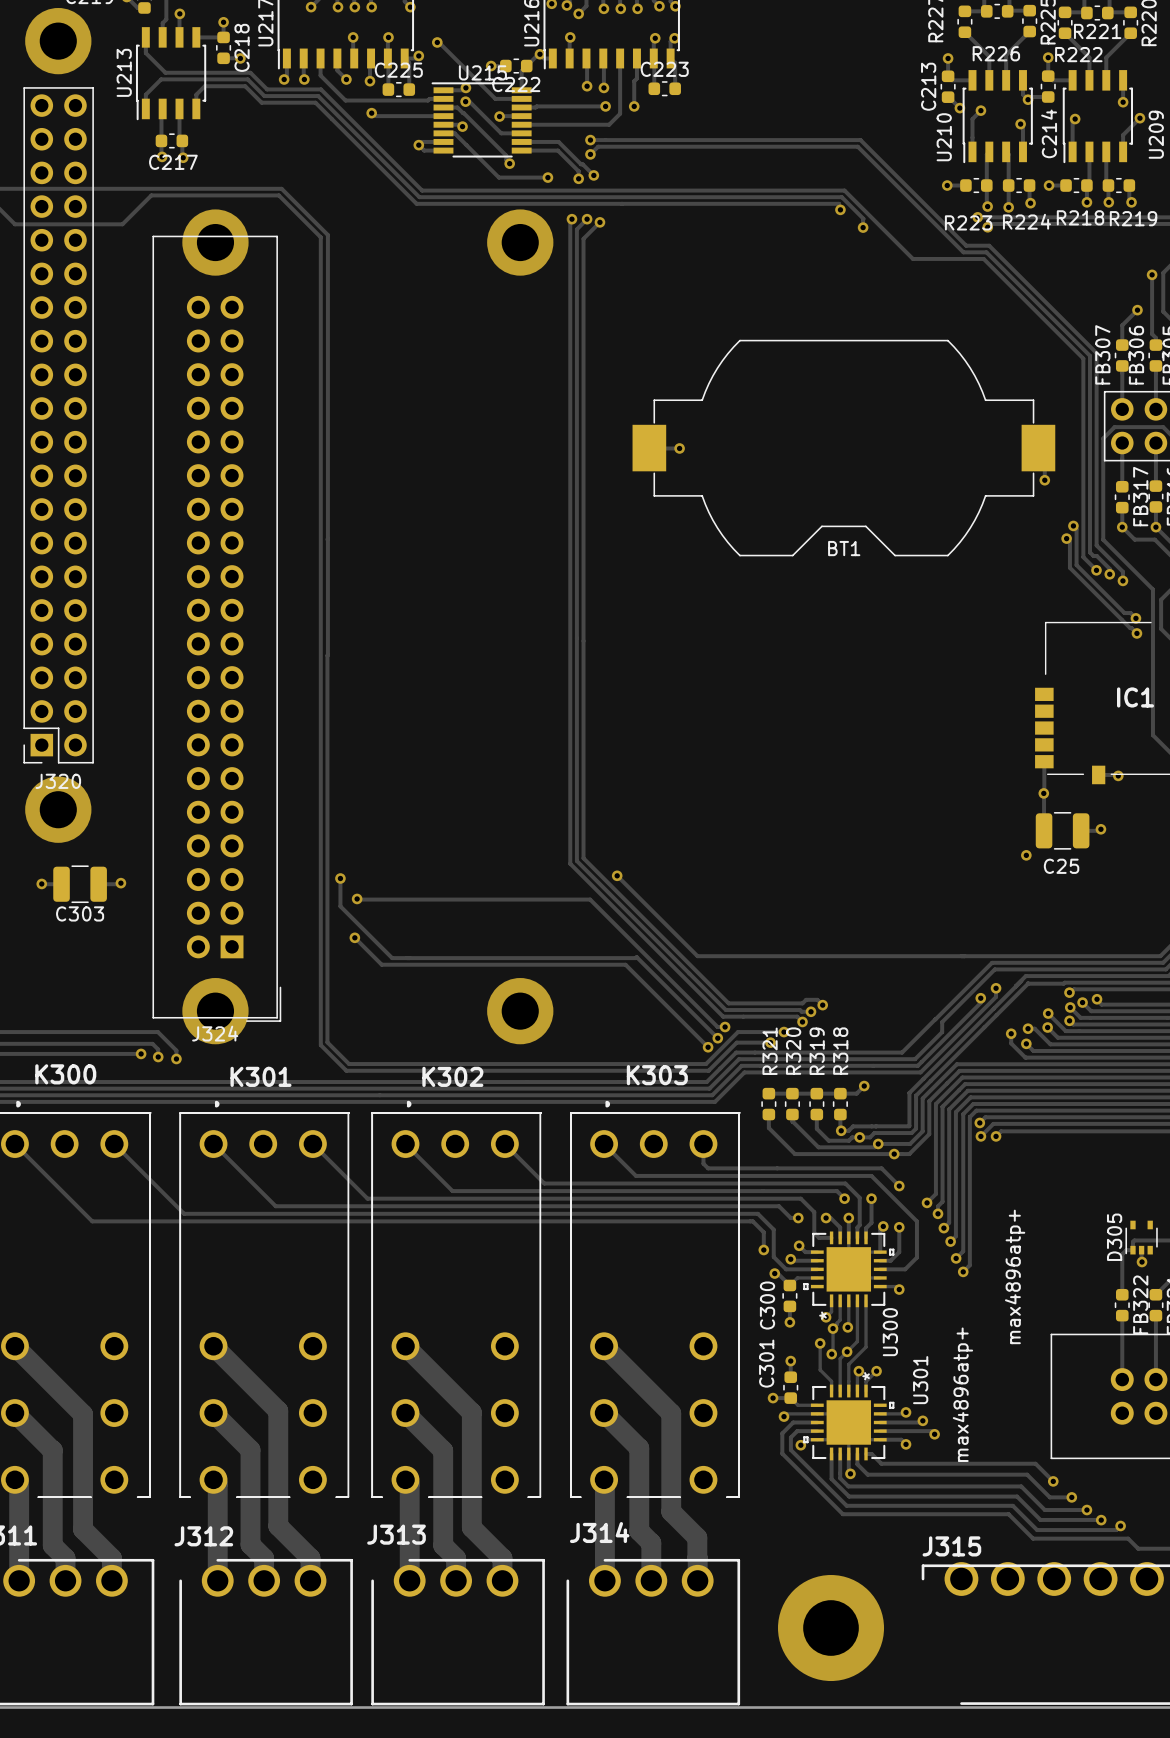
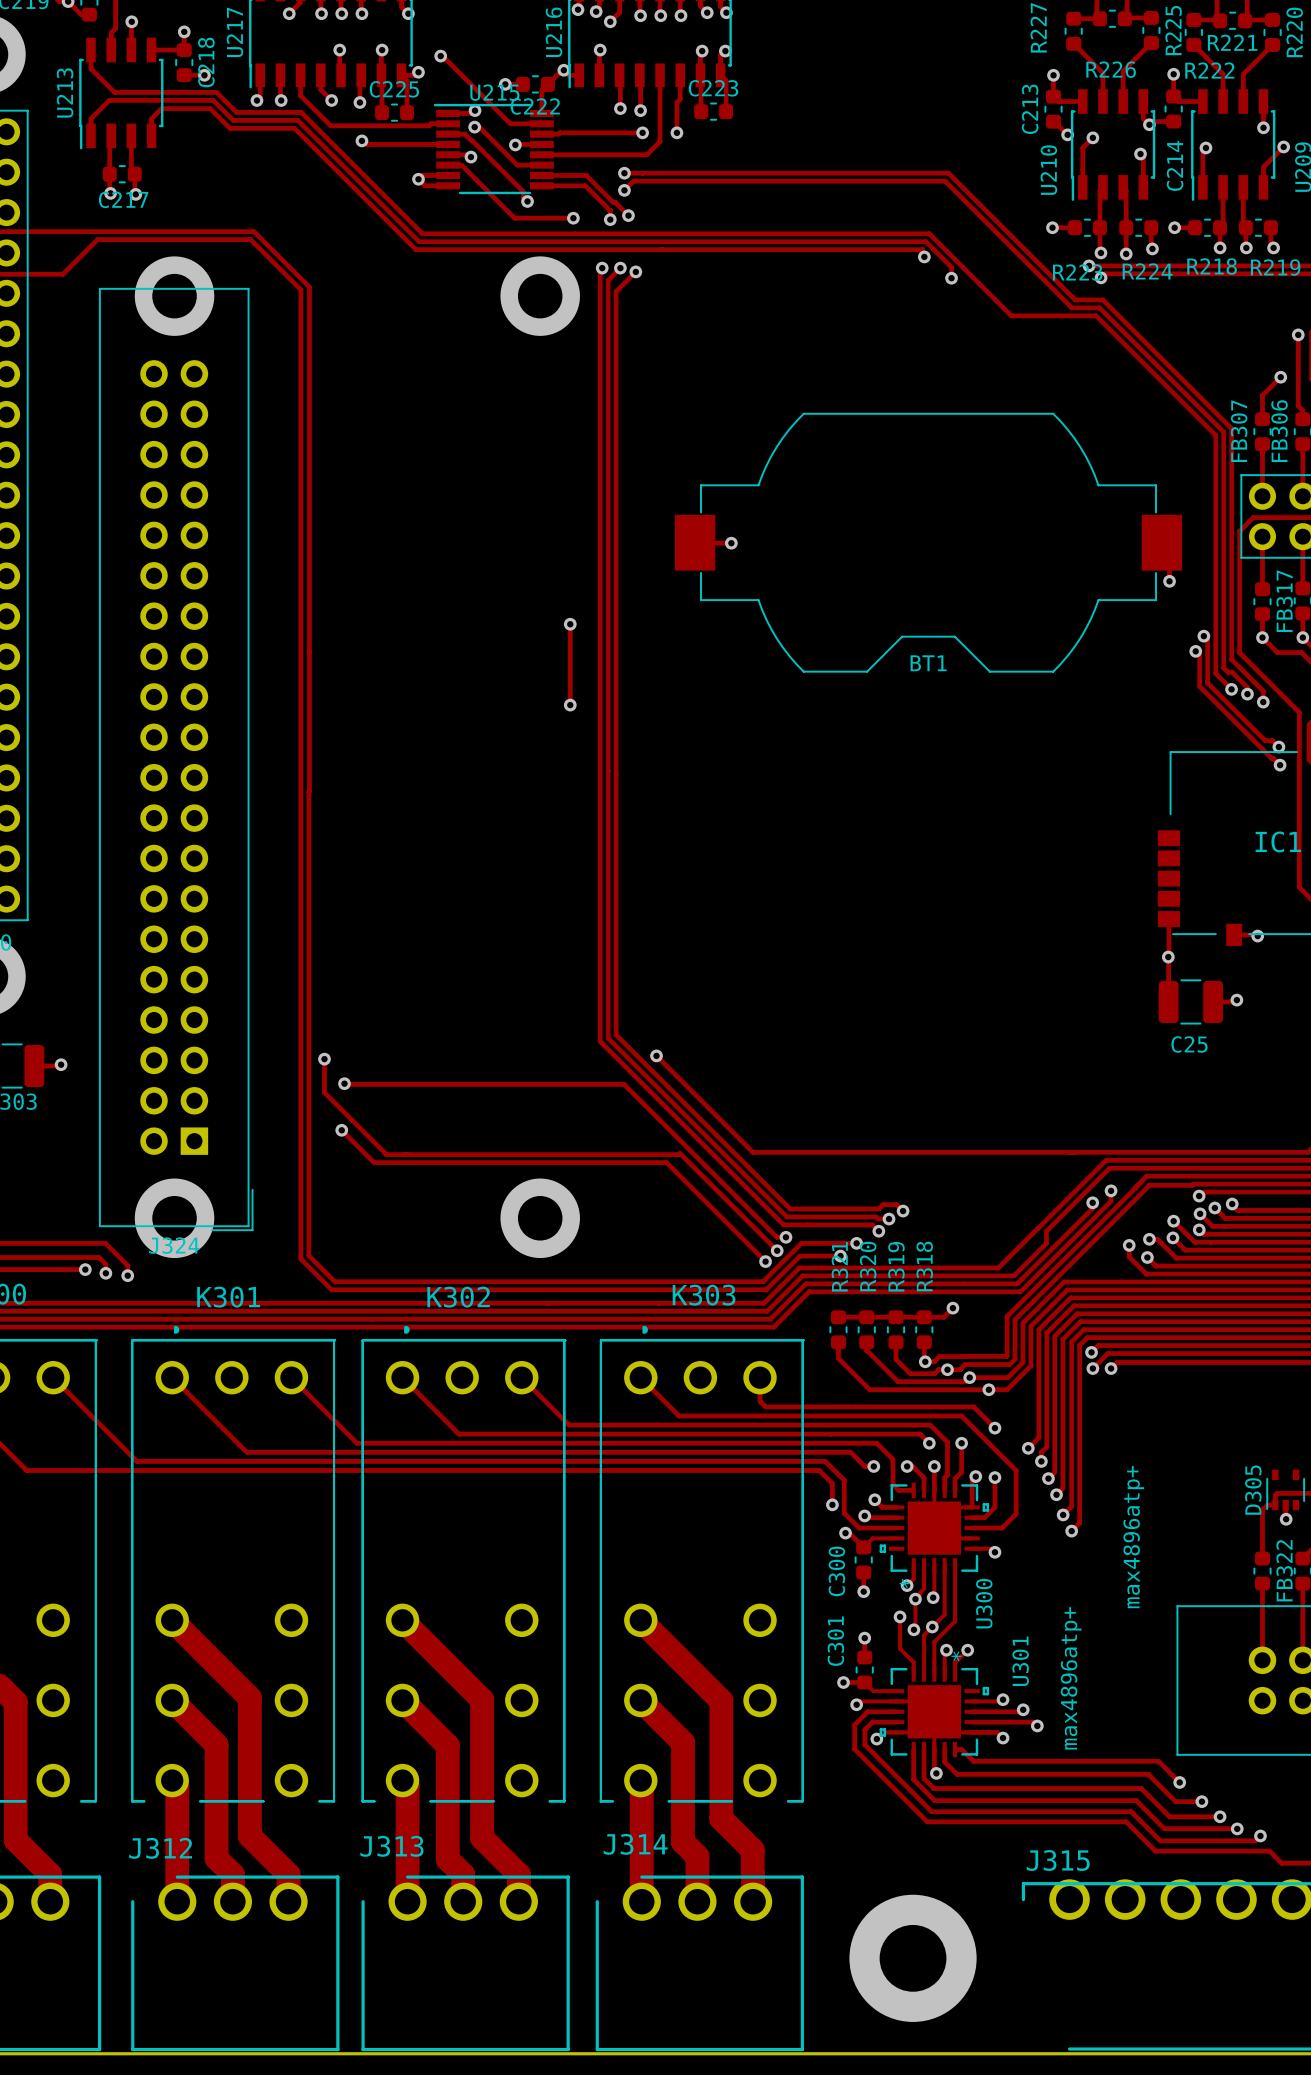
track: none -> (570, 624) (570, 705)
via: none -> (570, 624)
via: none -> (570, 705)
via: (1026, 855) -> none

